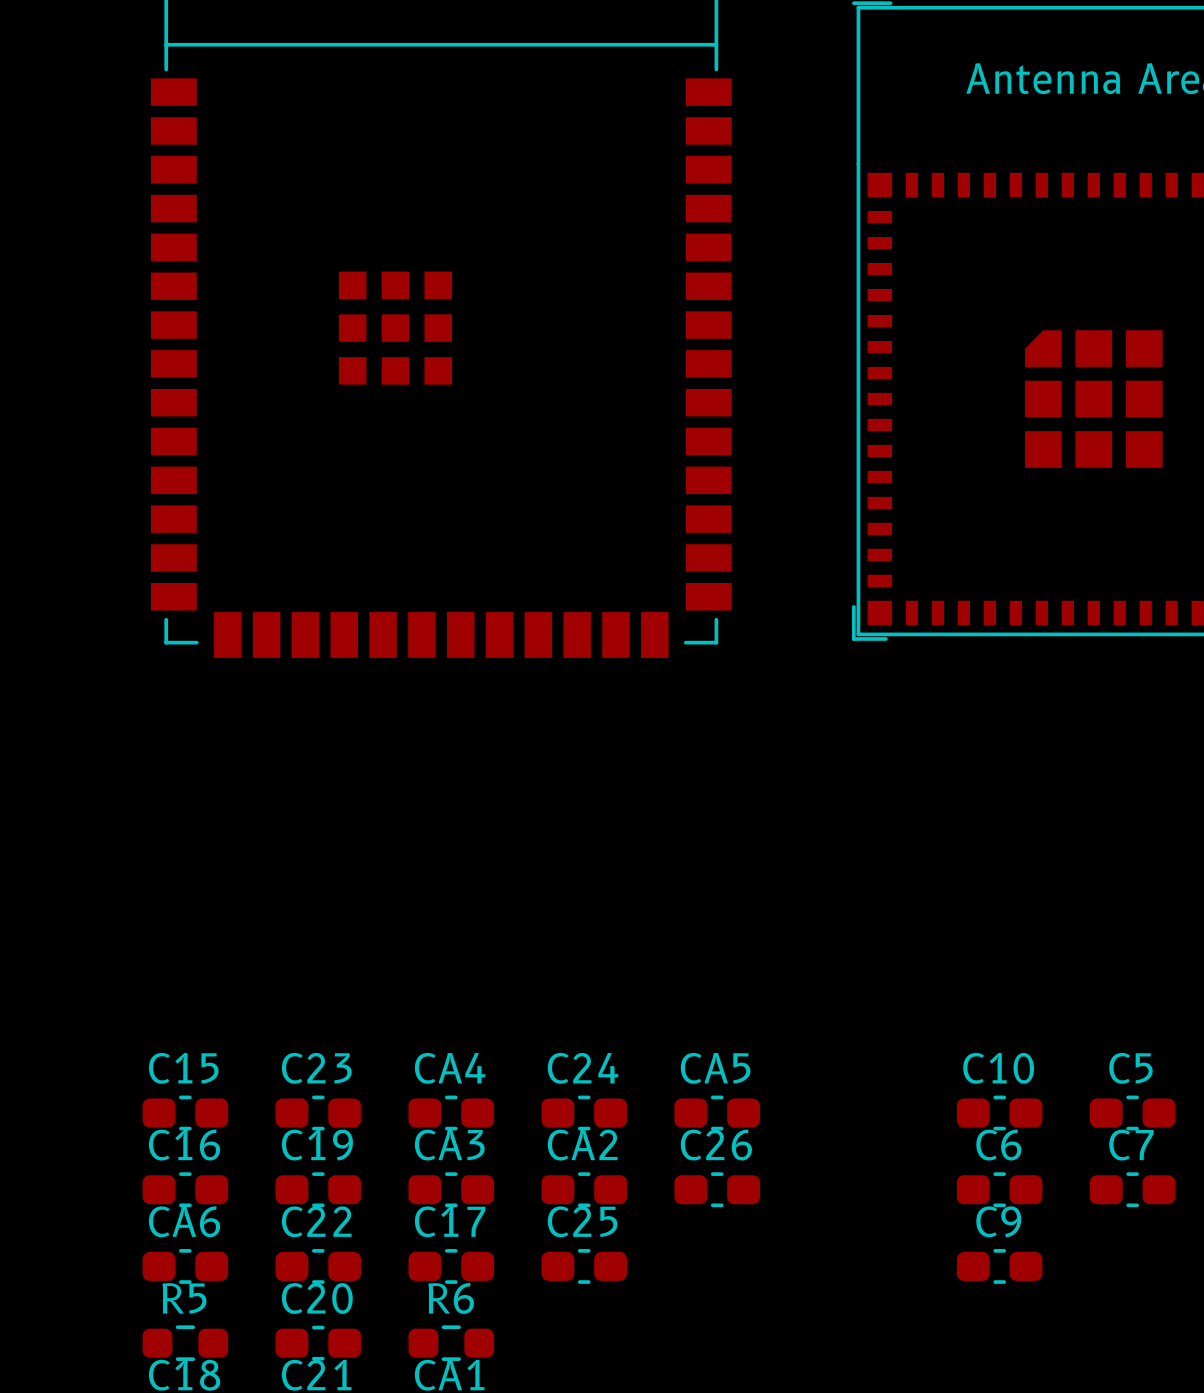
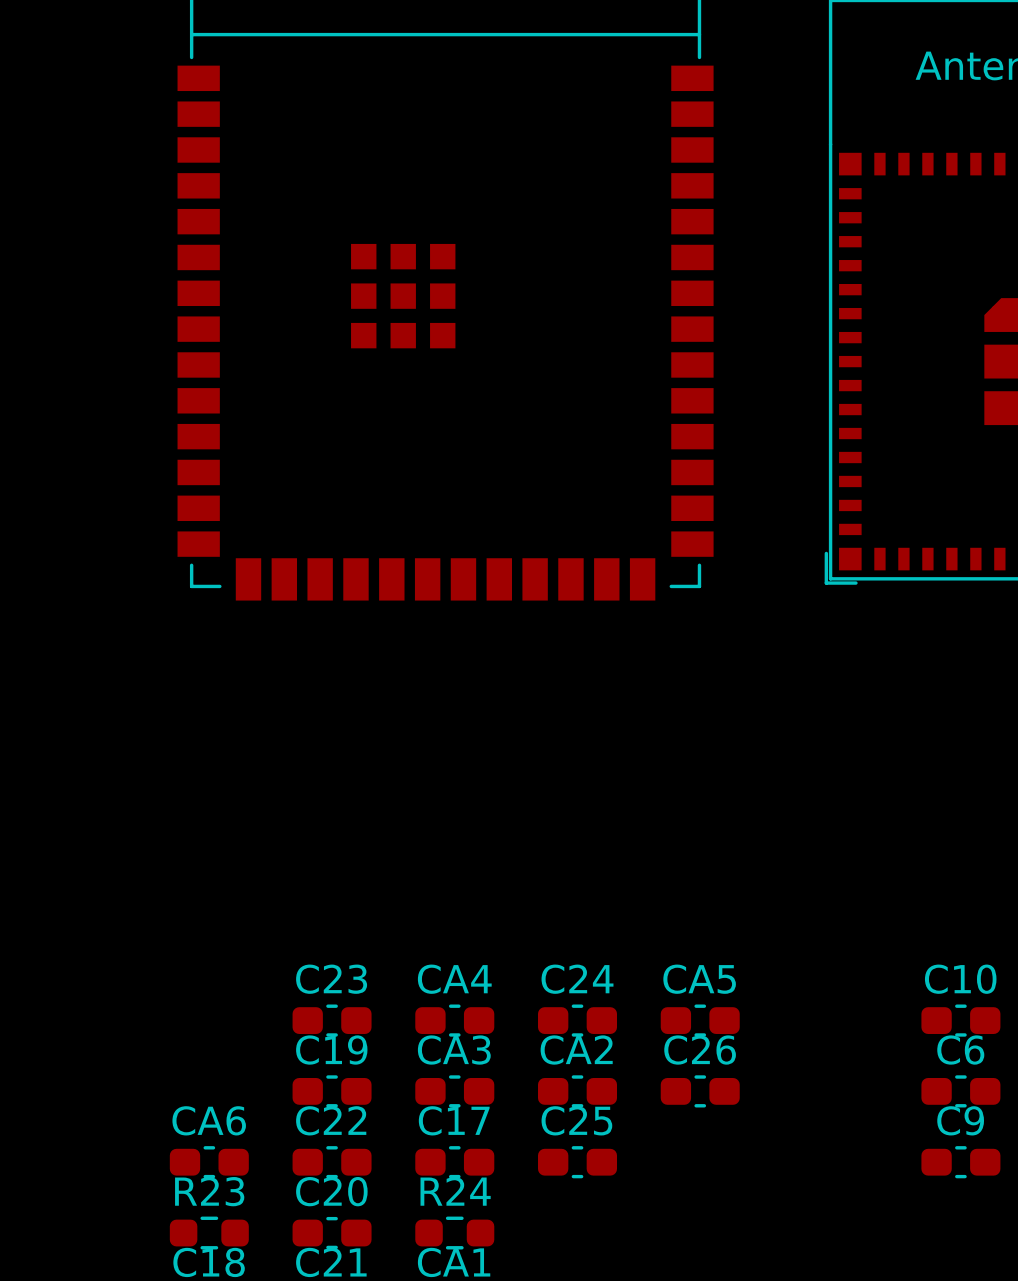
C15: (185, 1112) -> none
C16: (185, 1189) -> none
R5 name: R5 (184, 1298) -> R23 (209, 1191)
R6 name: R6 (451, 1298) -> R24 (455, 1191)

